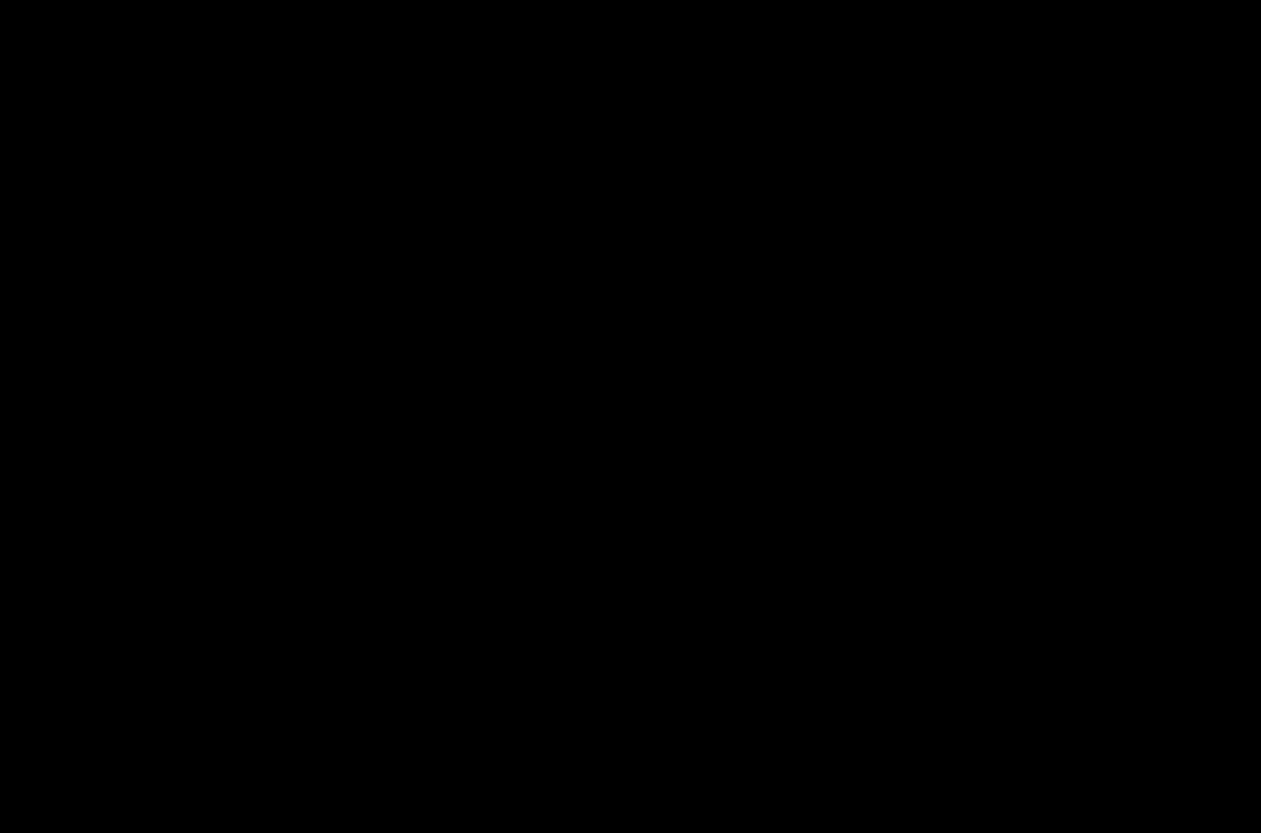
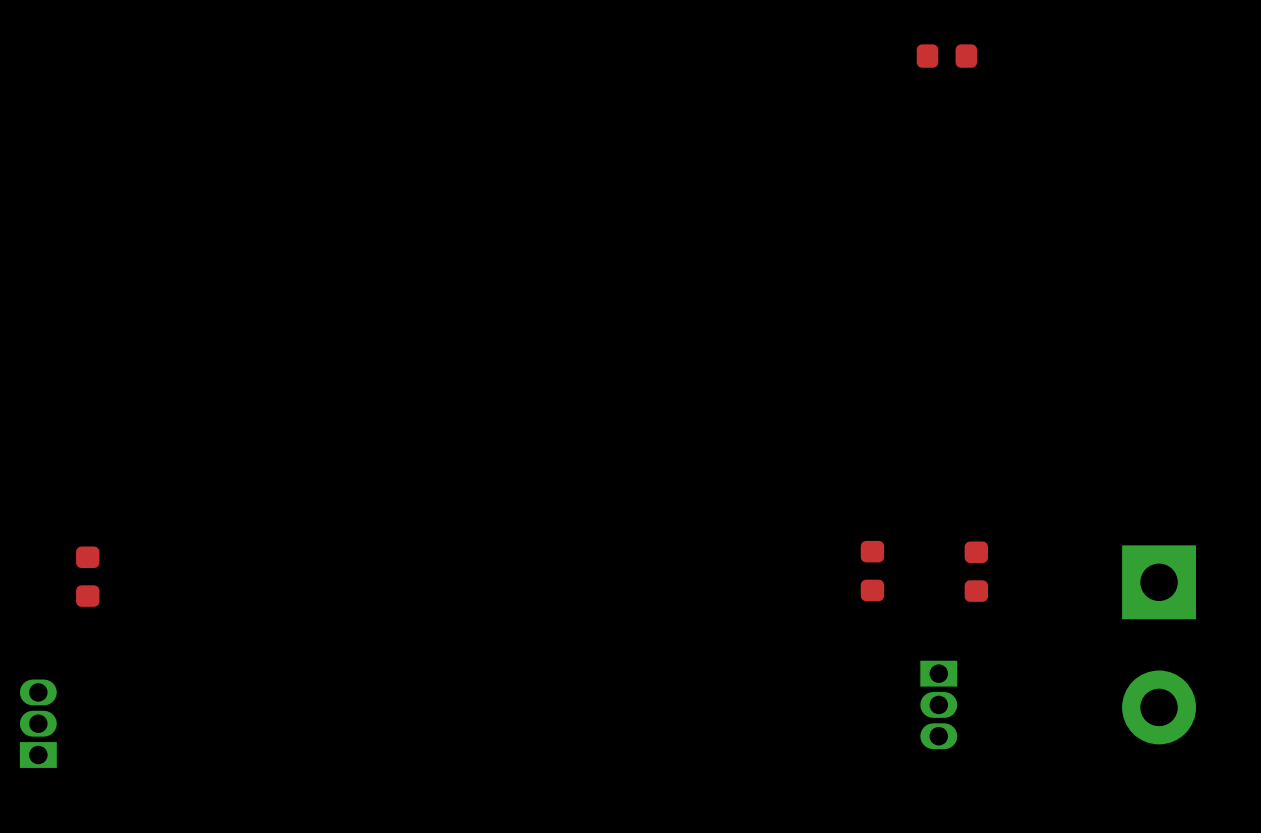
part: none -> (946, 56)
part: none -> (872, 571)
part: none -> (976, 571)
part: none -> (87, 576)
part: none -> (1159, 644)
part: none -> (938, 704)
part: none -> (38, 723)

